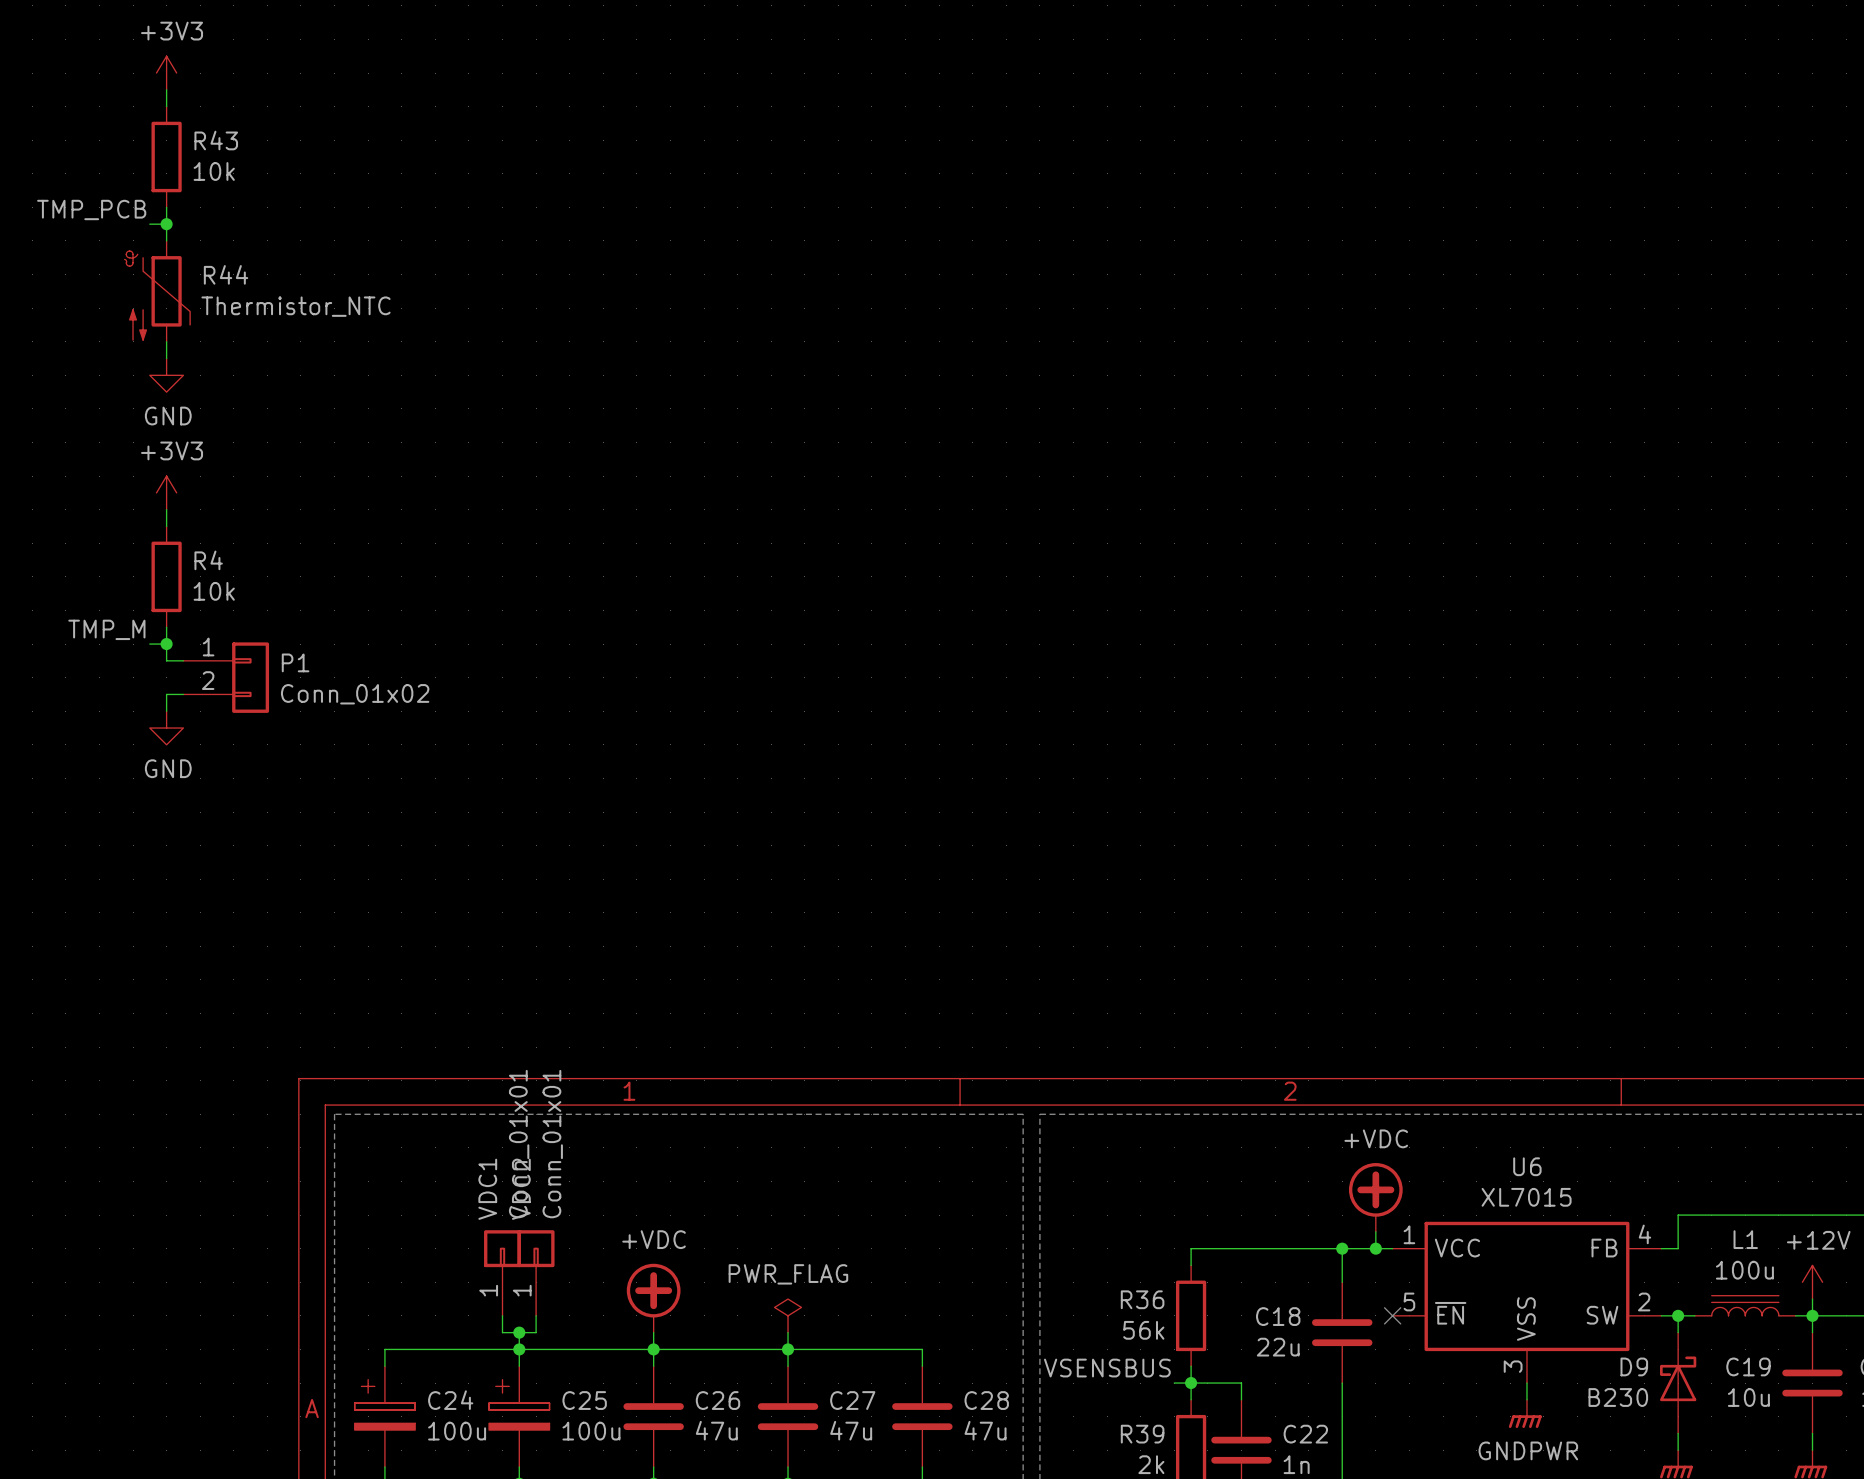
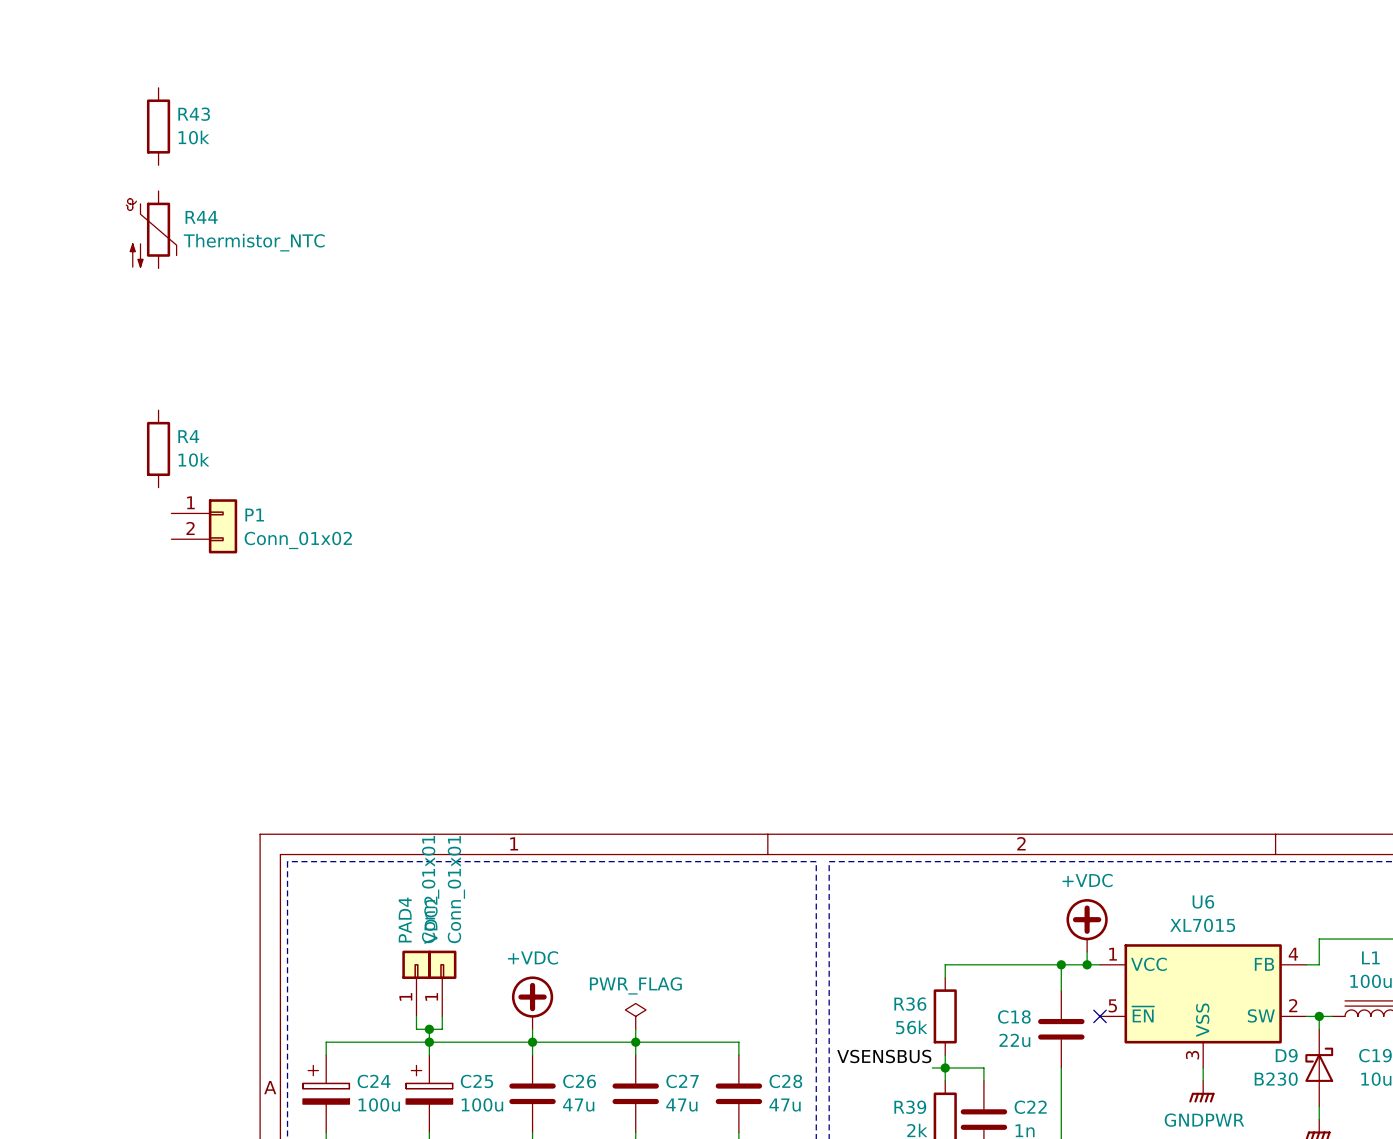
power symbol: +3V3 (166, 73) -> none
wire: (166, 89) (166, 106) -> none
wire: (166, 207) (166, 240) -> none
label: TMP_PCB (91, 209) -> none
wire: (149, 224) (166, 224) -> none
junction: (166, 224) -> none
wire: (166, 341) (166, 358) -> none
power symbol: GND (166, 375) -> none
power symbol: +3V3 (166, 492) -> none
wire: (166, 509) (166, 526) -> none
wire: (166, 627) (166, 660) (183, 660) -> none
label: TMP_M (106, 629) -> none
wire: (149, 644) (166, 644) -> none
junction: (166, 644) -> none
wire: (183, 694) (166, 694) (166, 711) -> none
power symbol: GND (166, 728) -> none
VDC1 name: VDC1 (487, 1189) -> PAD4 (405, 919)

